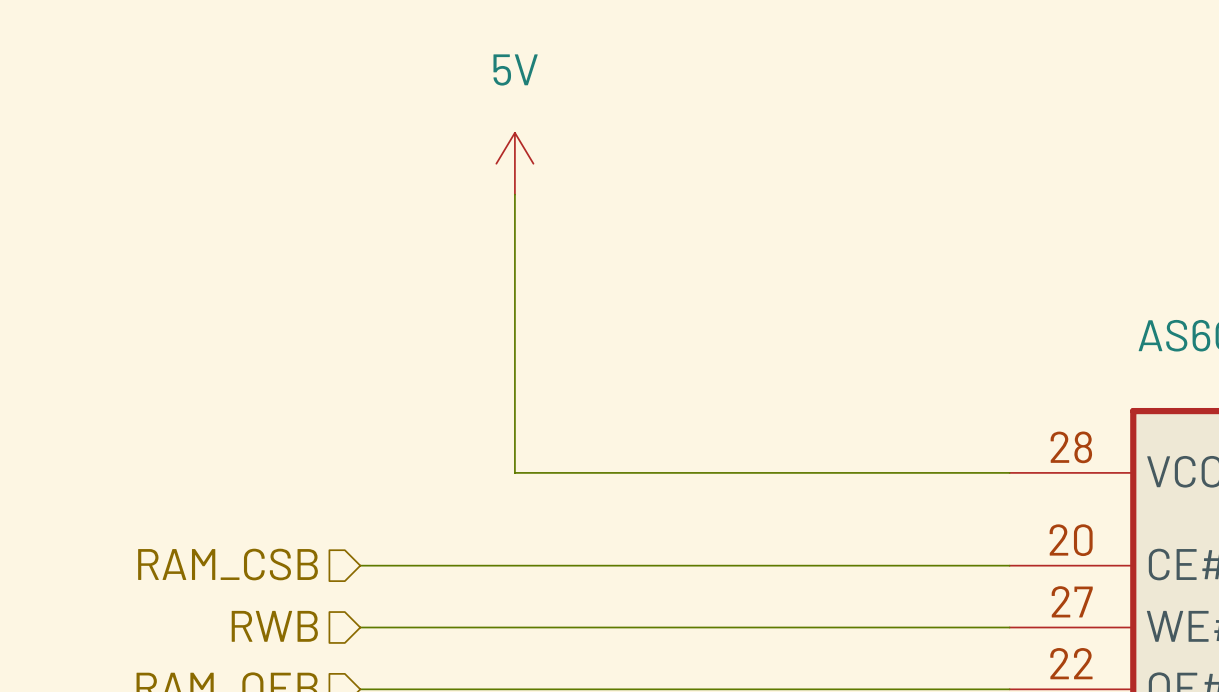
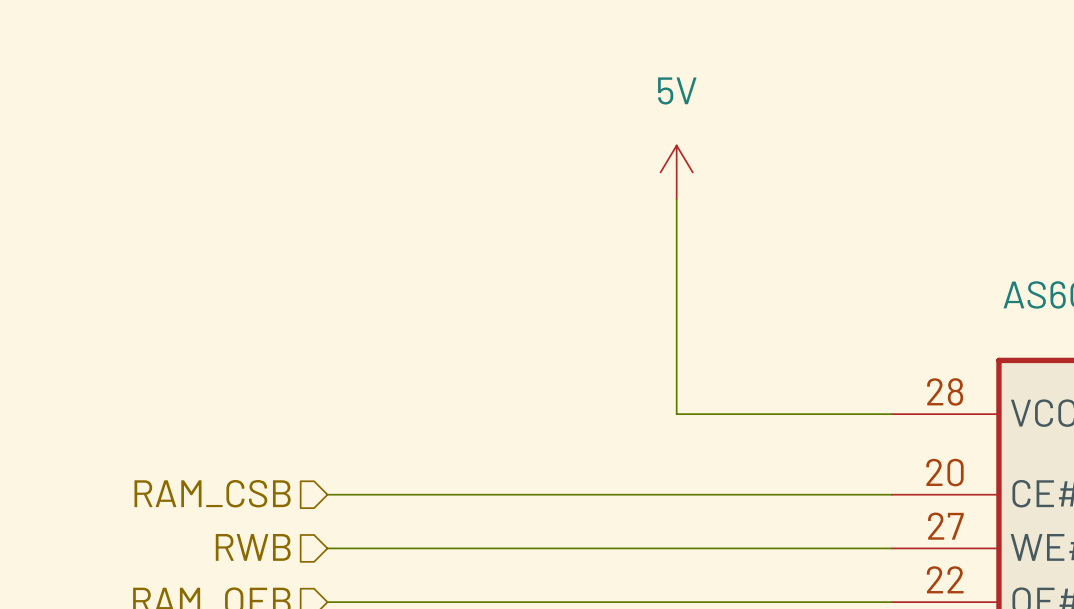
power symbol position: 5V (514, 163) -> 5V (676, 172)
wire: (514, 194) (514, 472) (762, 472) -> (676, 199) (676, 414)

